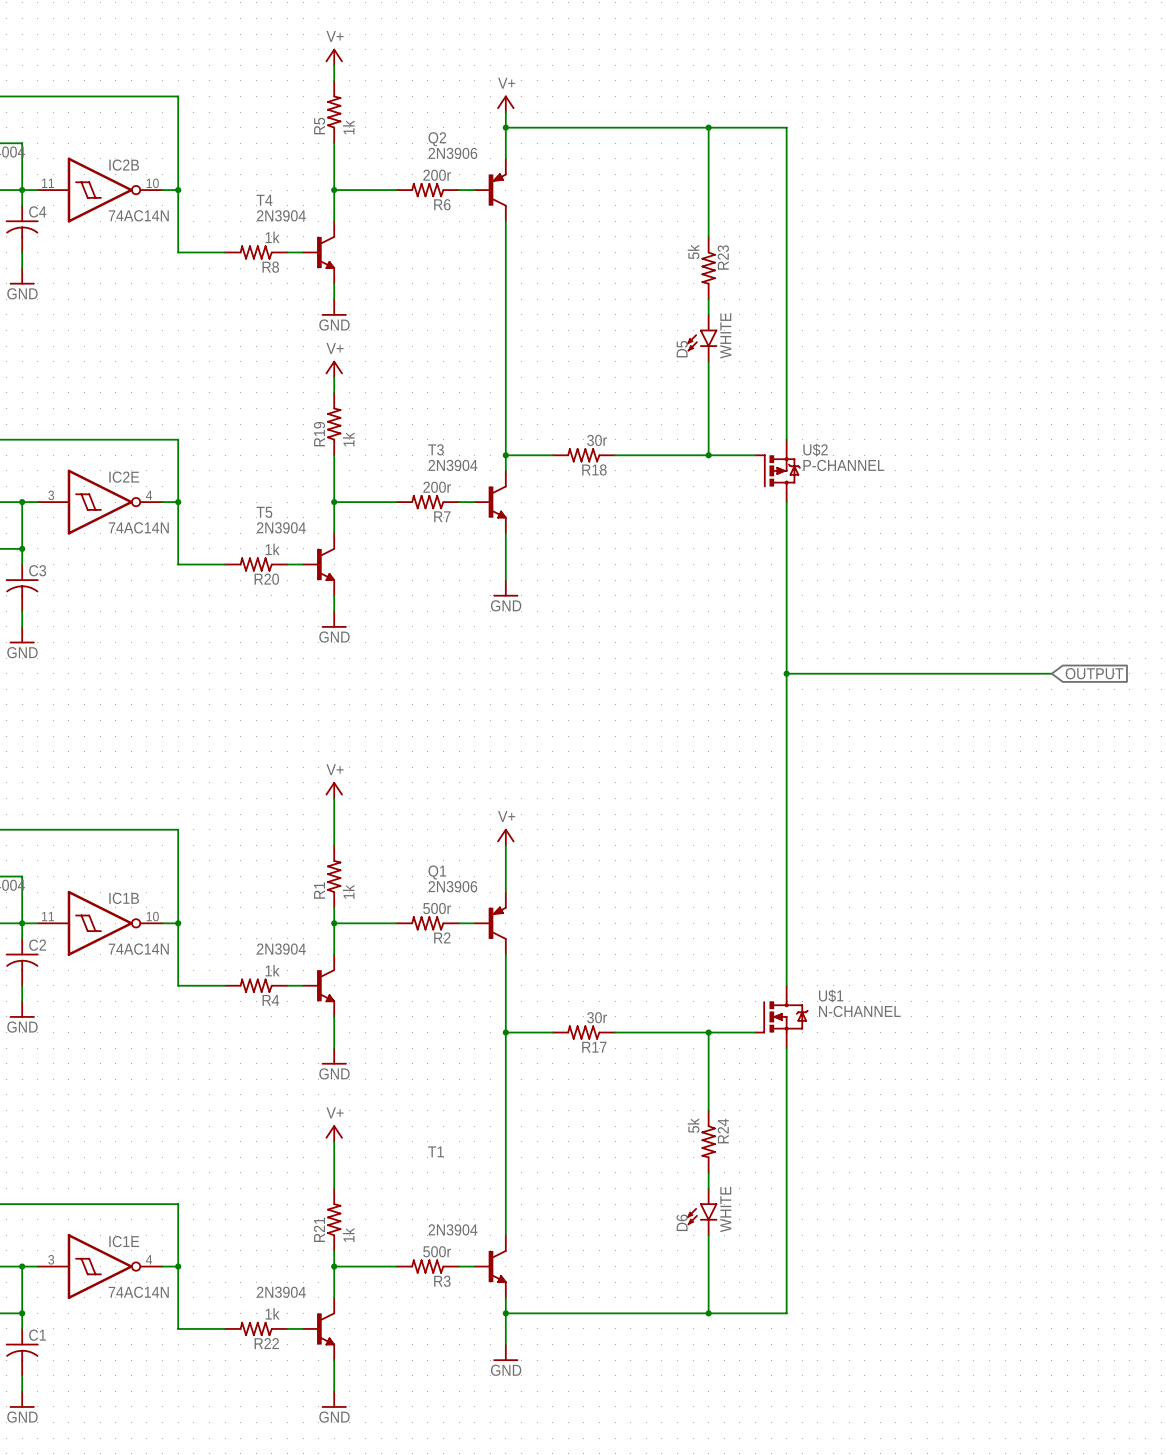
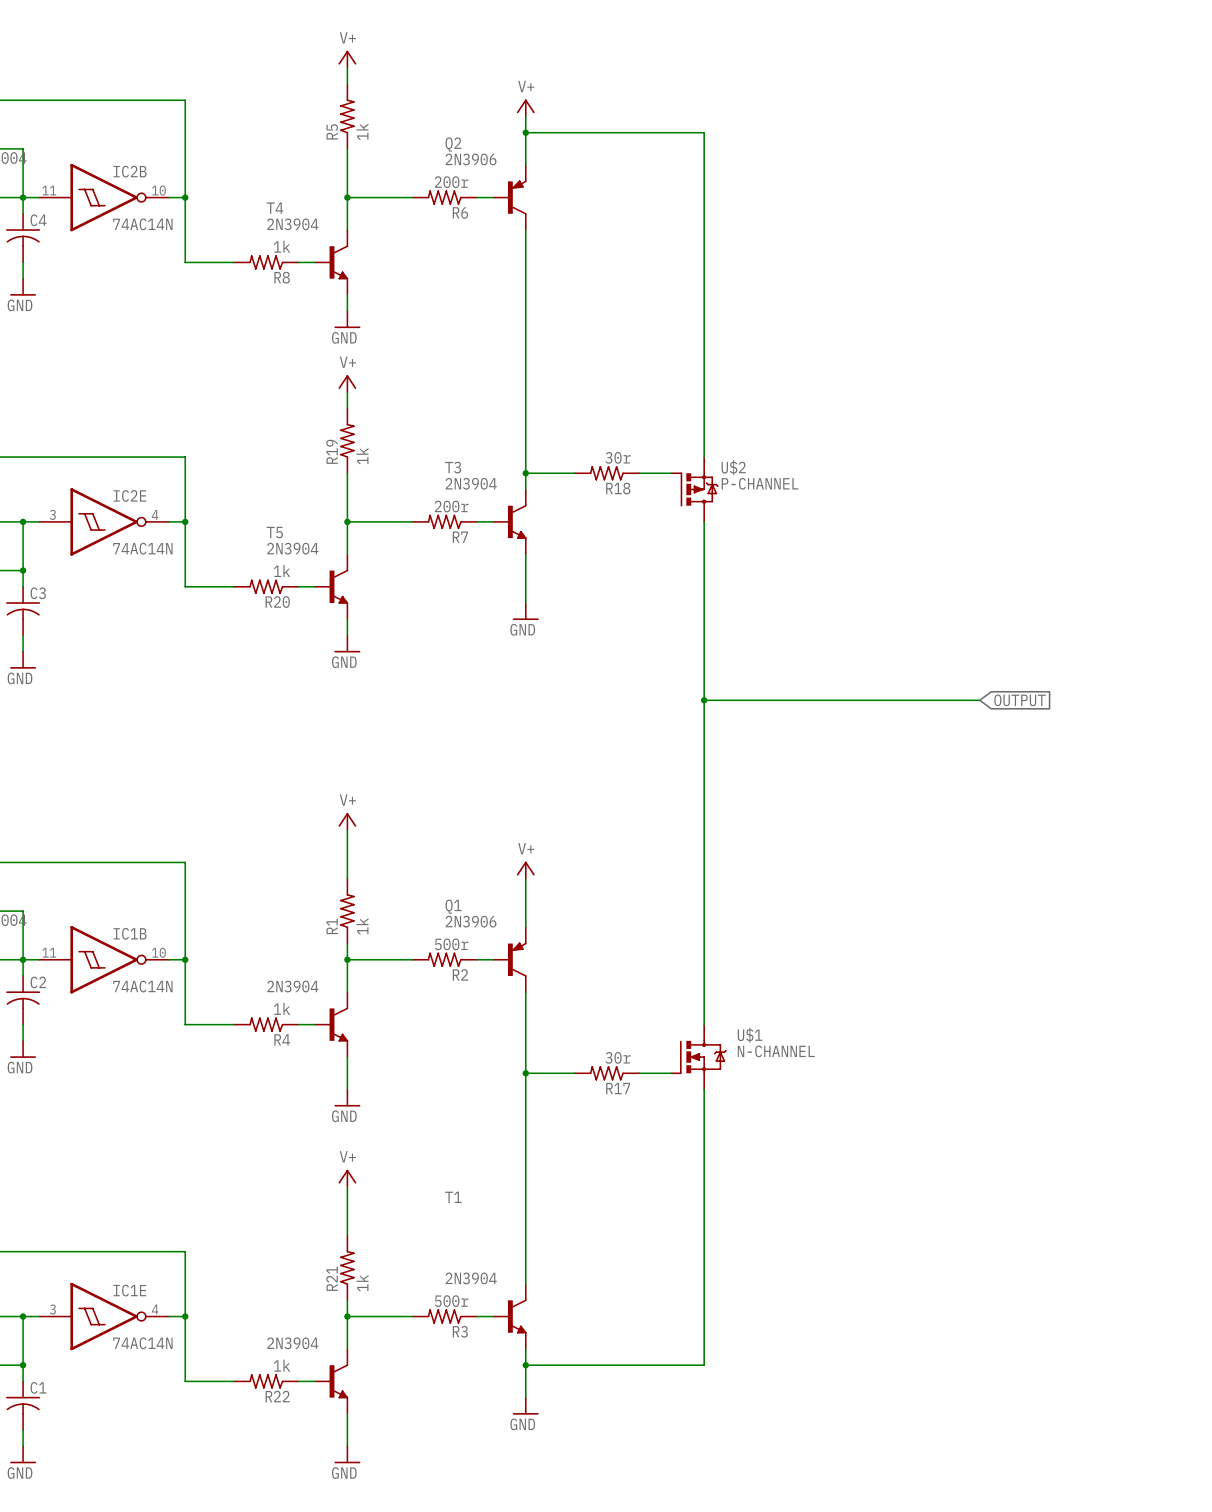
wire: (677, 127) (786, 127) (786, 439) -> (704, 132) (704, 457)
wire: (708, 127) (708, 236) -> none
junction: (708, 127) -> none
R23: 5k (708, 268) -> none
wire: (708, 299) (708, 314) -> none
D5: WHITE (702, 338) -> none
wire: (708, 361) (708, 455) -> none
wire: (646, 455) (755, 455) -> none
junction: (708, 455) -> none
U$2 position: (777, 470) -> (694, 489)
wire: (786, 502) (786, 985) -> (704, 521) (704, 1024)
wire: none -> (704, 700) (817, 700)
junction: none -> (704, 700)
junction: (786, 673) -> none
wire: (942, 673) (1051, 673) -> none
global label position: OUTPUT (1094, 673) -> OUTPUT (1020, 700)
U$1 position: (781, 1016) -> (698, 1057)
wire: (646, 1032) (755, 1032) -> none
wire: (708, 1032) (708, 1110) -> none
junction: (708, 1032) -> none
wire: (786, 1048) (786, 1313) (677, 1313) -> (704, 1089) (704, 1365)
R24: 5k (708, 1141) -> none
wire: (708, 1172) (708, 1188) -> none
D6: WHITE (702, 1211) -> none
wire: (708, 1235) (708, 1313) -> none
junction: (708, 1313) -> none

